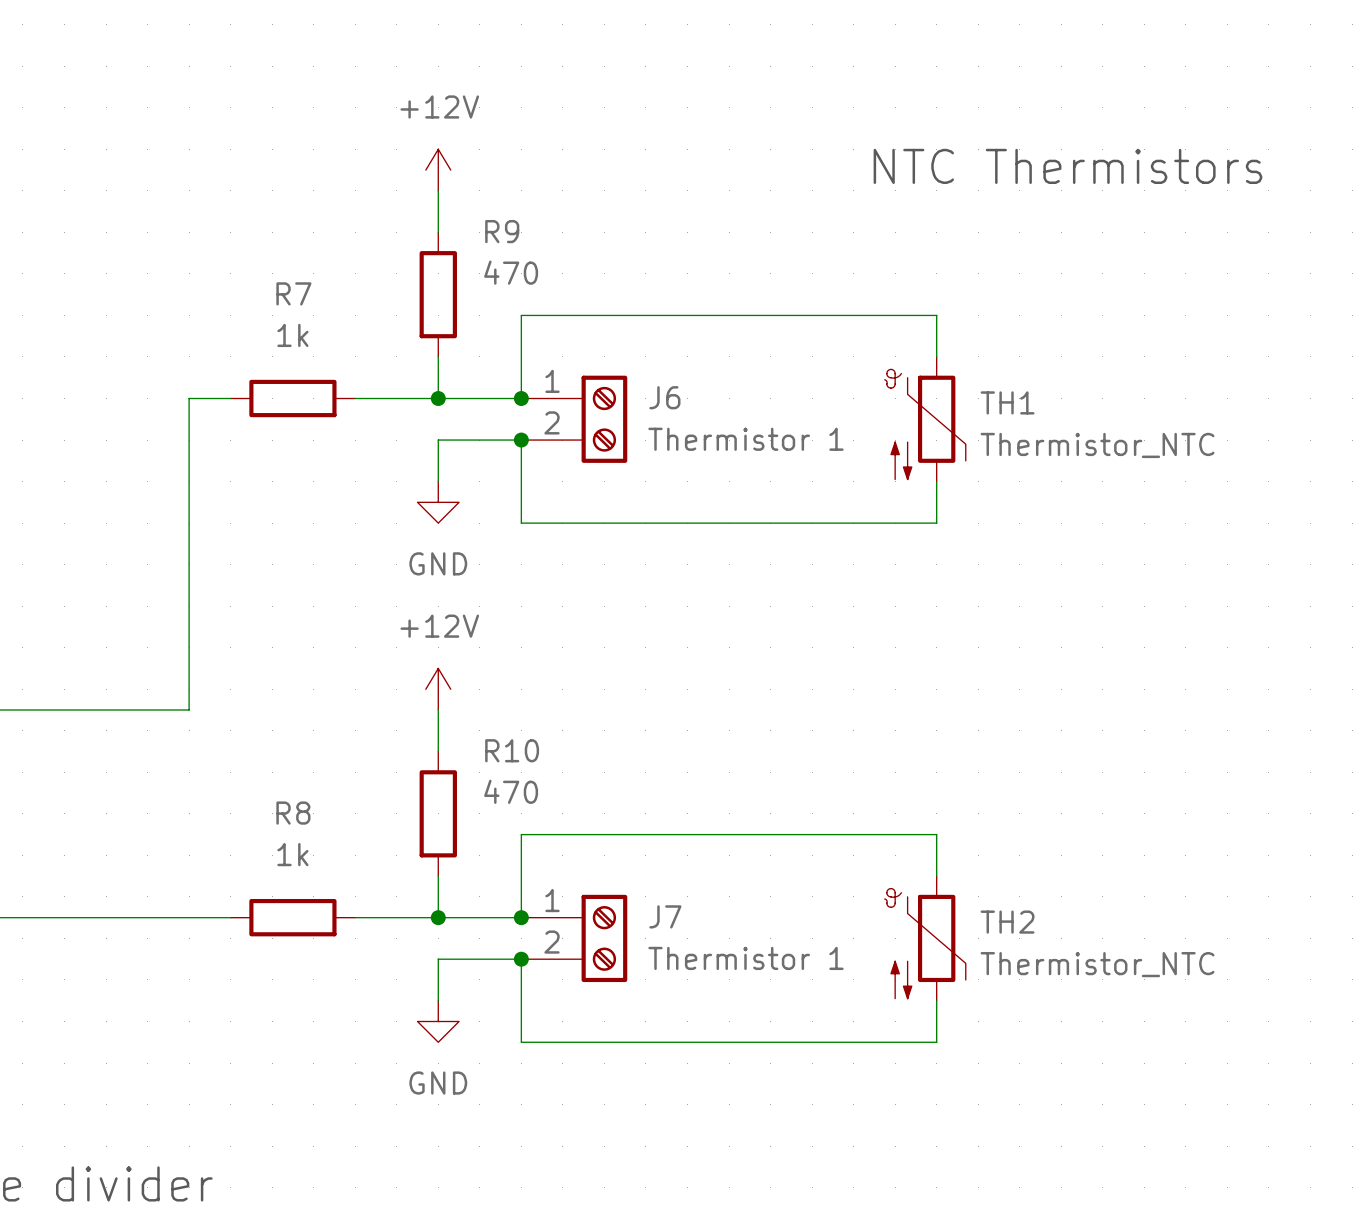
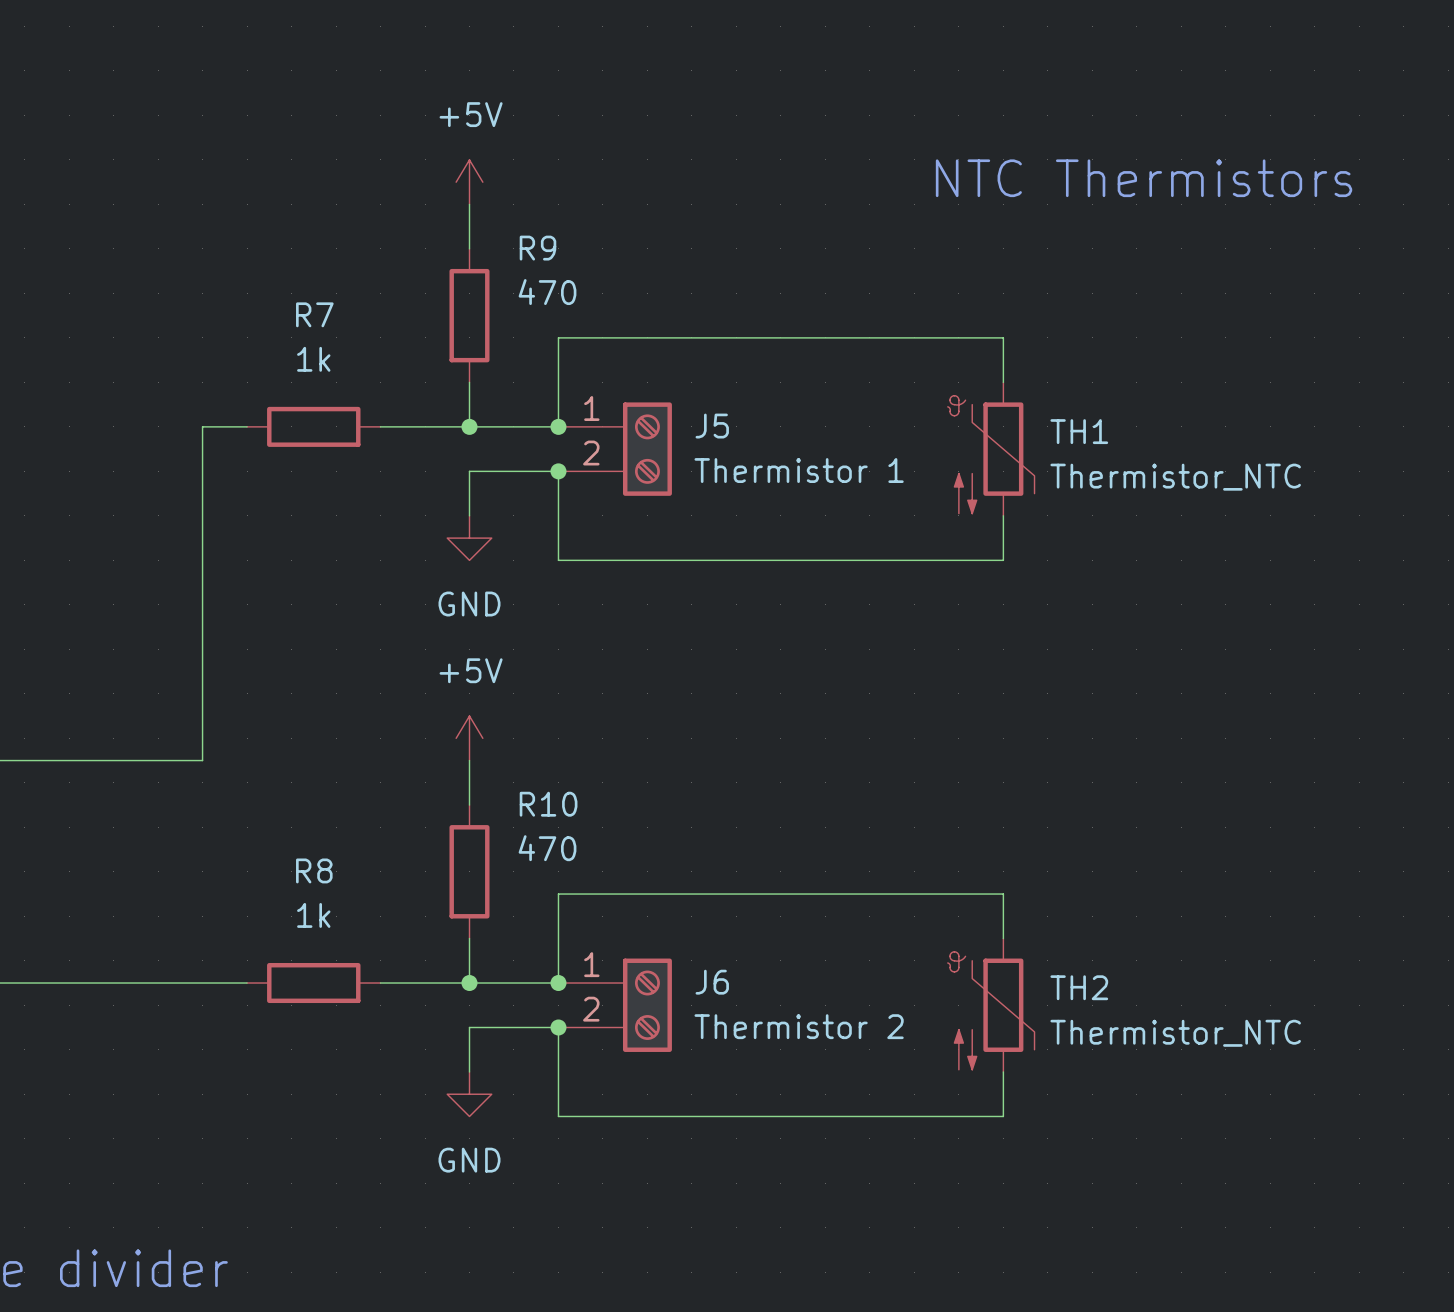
power symbol: +12V (438, 170) -> +5V (469, 182)
J6 name: J6 (664, 397) -> J5 (712, 426)
power symbol: +12V (438, 689) -> +5V (469, 738)
J7 name: J7 (665, 916) -> J6 (712, 982)
J7 value: Thermistor 1 (745, 958) -> Thermistor 2 (799, 1026)

